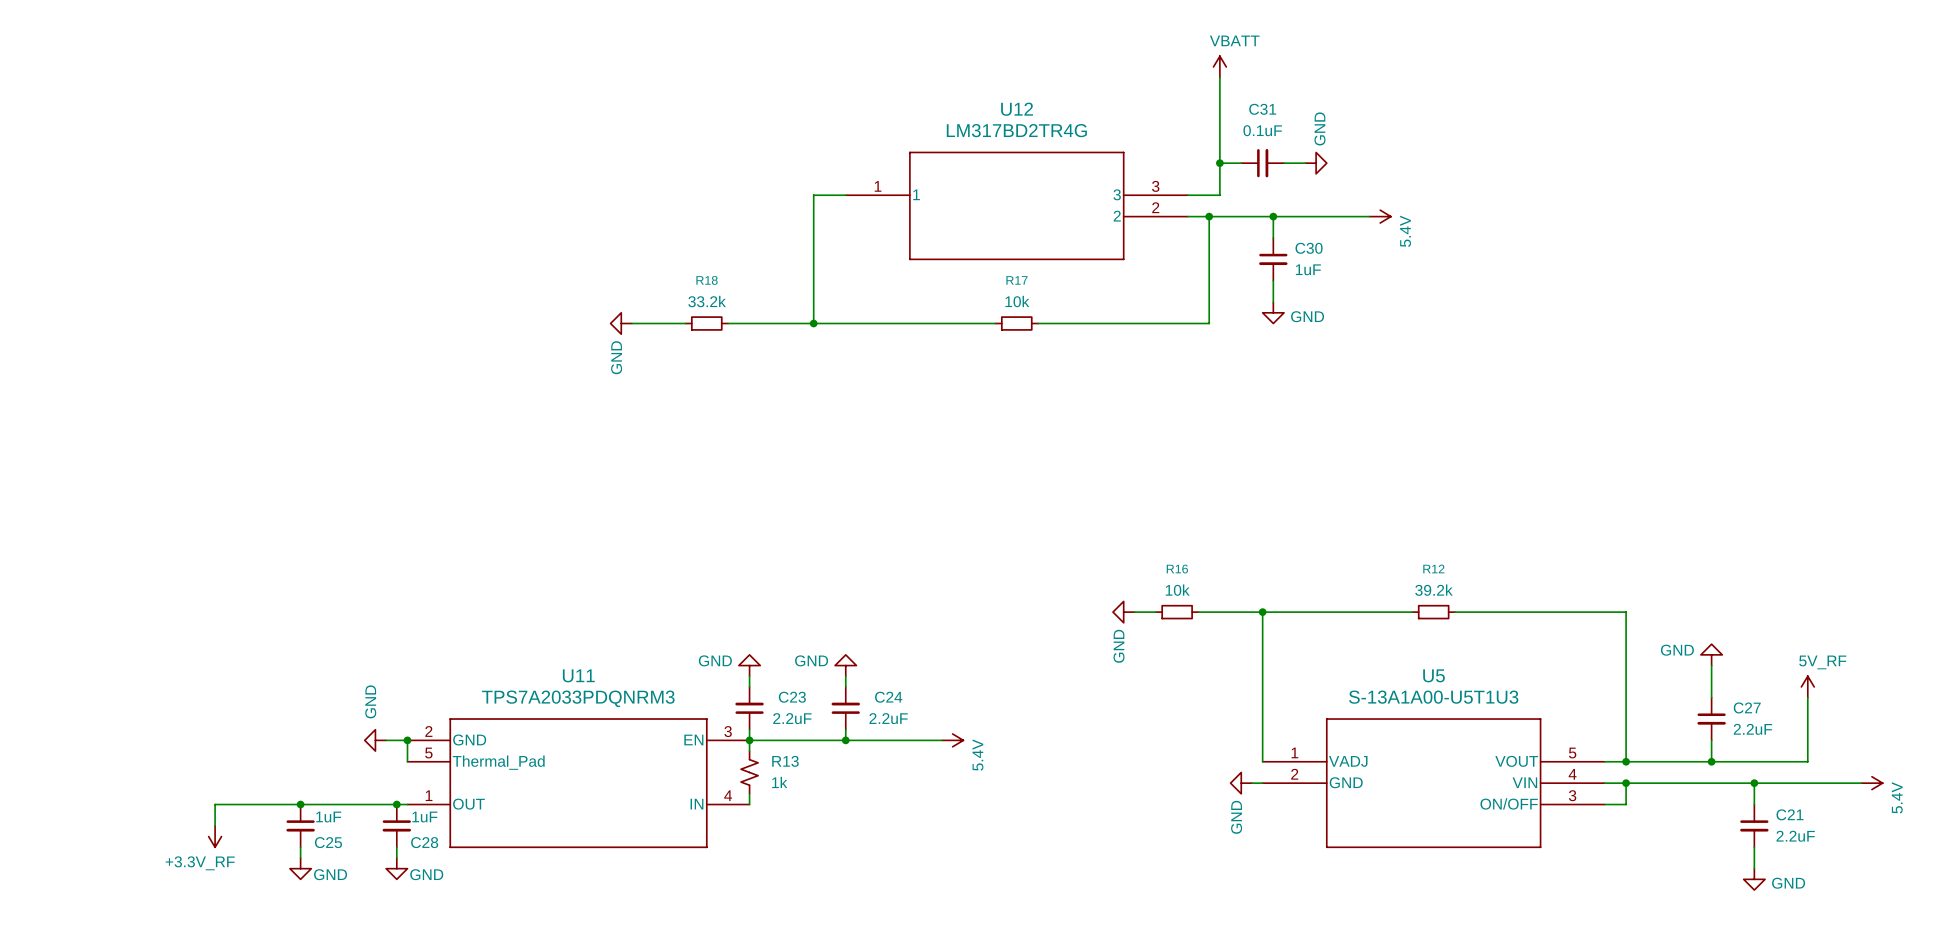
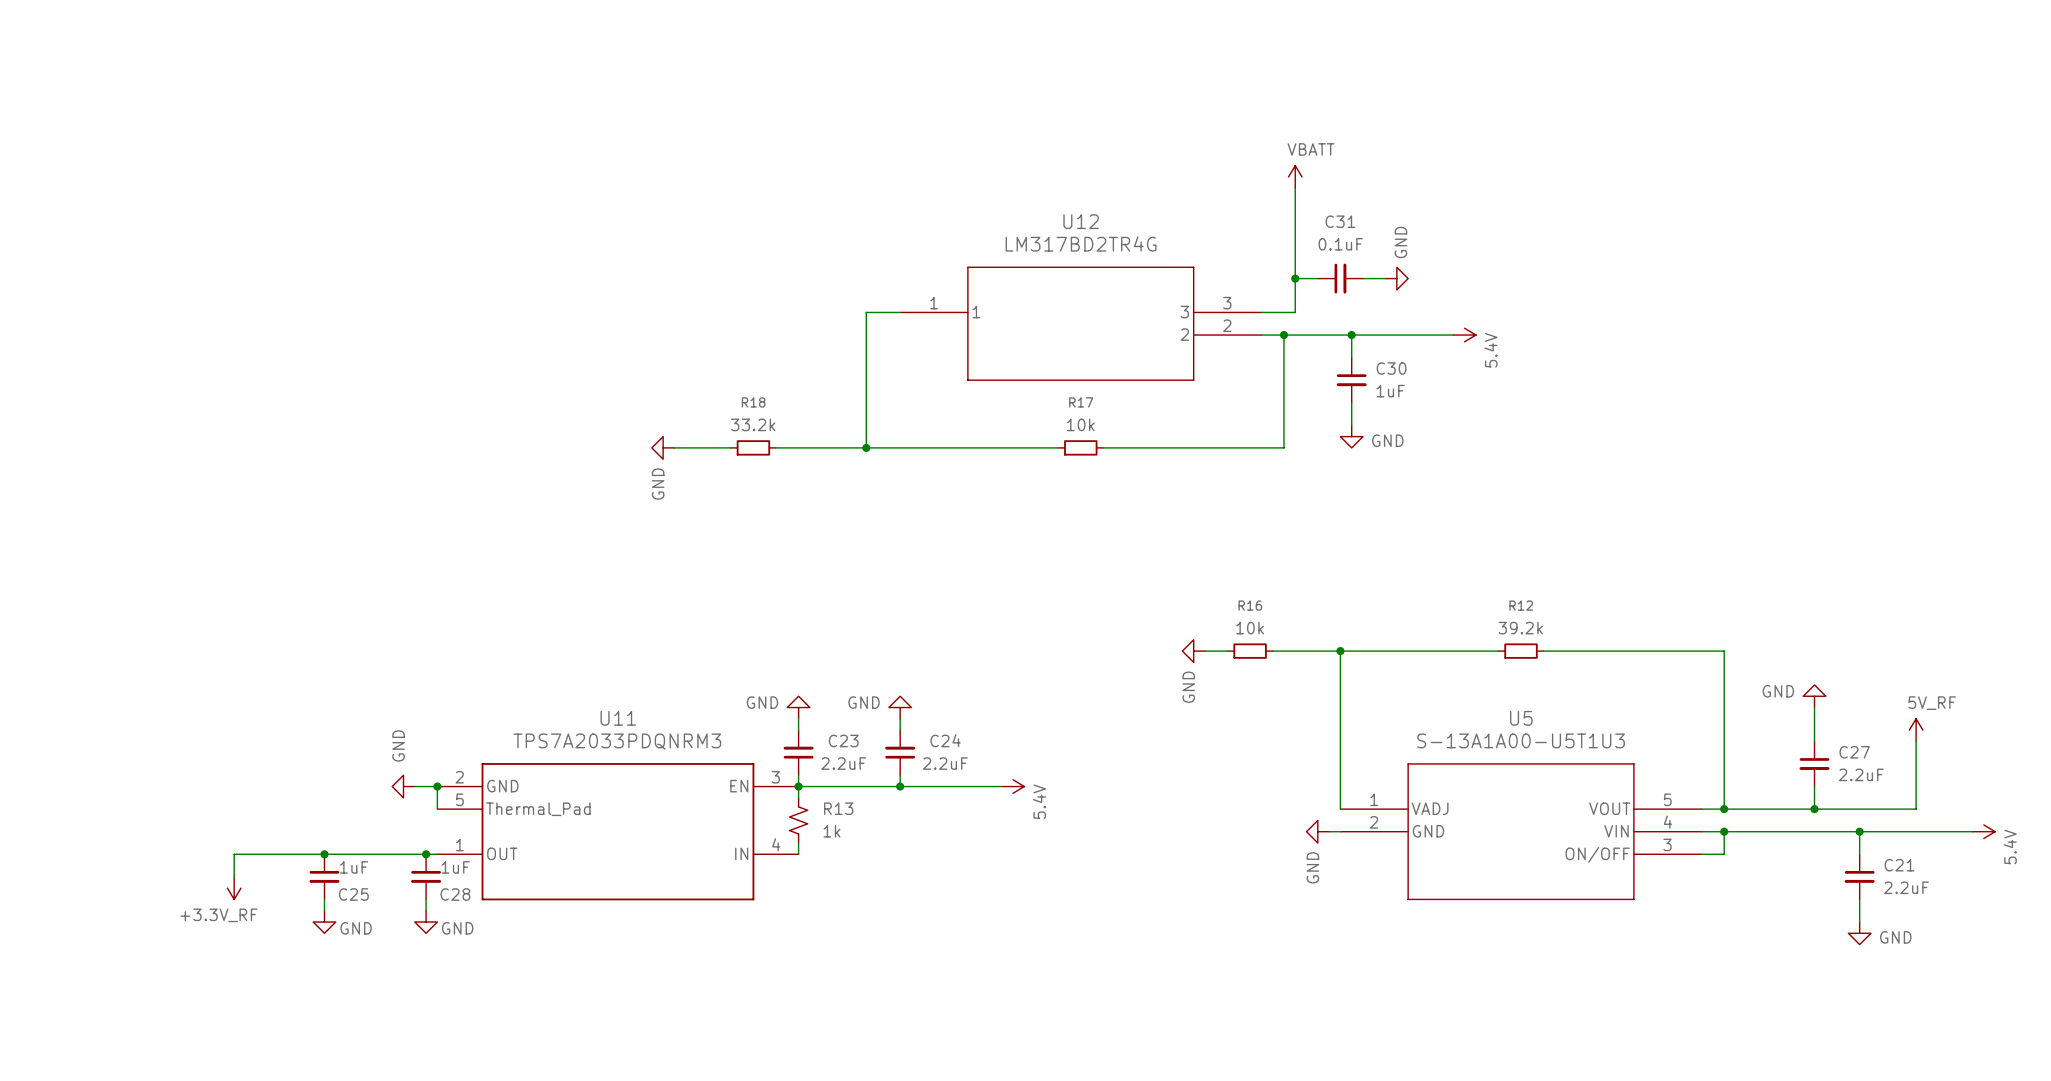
power symbol position: VBATT (1219, 66) -> VBATT (1295, 176)
wire: (1219, 77) (1219, 173) -> none
wire: (1219, 163) (1241, 163) -> (1295, 278) (1317, 278)
junction: (1219, 163) -> none
C31 position: (1262, 163) -> (1340, 278)
wire: (1284, 163) (1305, 163) -> (1362, 278) (1385, 278)
power symbol: GND (1316, 163) -> none
wire: (845, 195) (813, 195) (813, 291) -> (900, 312) (866, 312)
wire: (1187, 195) (1219, 195) -> (1261, 312) (1295, 312) (1295, 210)
U12 position: (1016, 205) -> (1080, 323)
wire: (1187, 216) (1369, 216) -> (1261, 335) (1453, 335)
wire: (1209, 216) (1209, 312) -> none
junction: (1209, 216) -> none
wire: (1273, 216) (1273, 237) -> (1351, 335) (1351, 357)
junction: (1273, 216) -> none
power symbol position: 5.4V (1380, 216) -> 5.4V (1464, 335)
junction: none -> (1295, 278)
C30 position: (1273, 259) -> (1351, 380)
power symbol: none -> GND (1396, 278)
wire: (1273, 280) (1273, 302) -> (1351, 402) (1351, 425)
junction: none -> (1283, 335)
junction: none -> (1351, 335)
power symbol: GND (1273, 312) -> none
power symbol position: GND (621, 323) -> GND (663, 447)
wire: (631, 323) (685, 323) -> (674, 447) (730, 447)
R18 position: (706, 323) -> (753, 447)
wire: (728, 323) (995, 323) -> (776, 447) (1058, 447)
wire: none -> (866, 346) (866, 447)
junction: (813, 323) -> none
R17 position: (1016, 323) -> (1080, 447)
wire: (1038, 323) (1209, 323) -> (1103, 447) (1283, 447) (1283, 346)
power symbol: none -> GND (1351, 436)
junction: none -> (866, 447)

